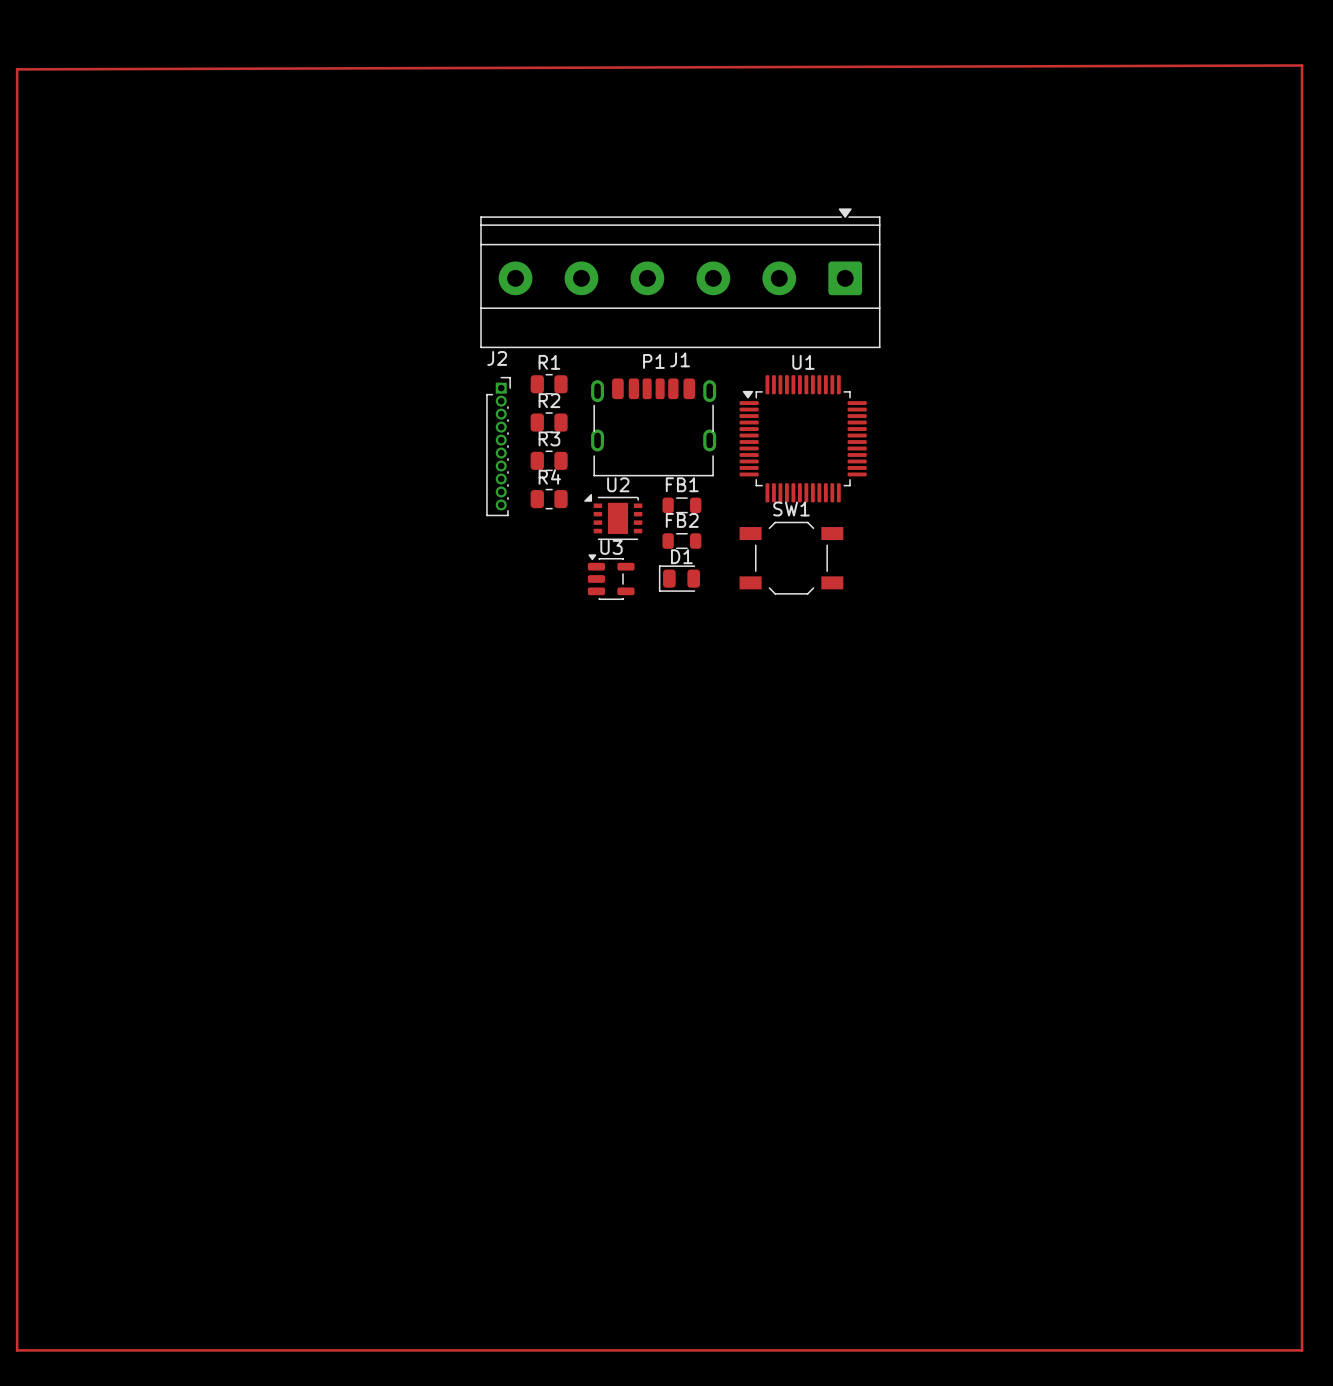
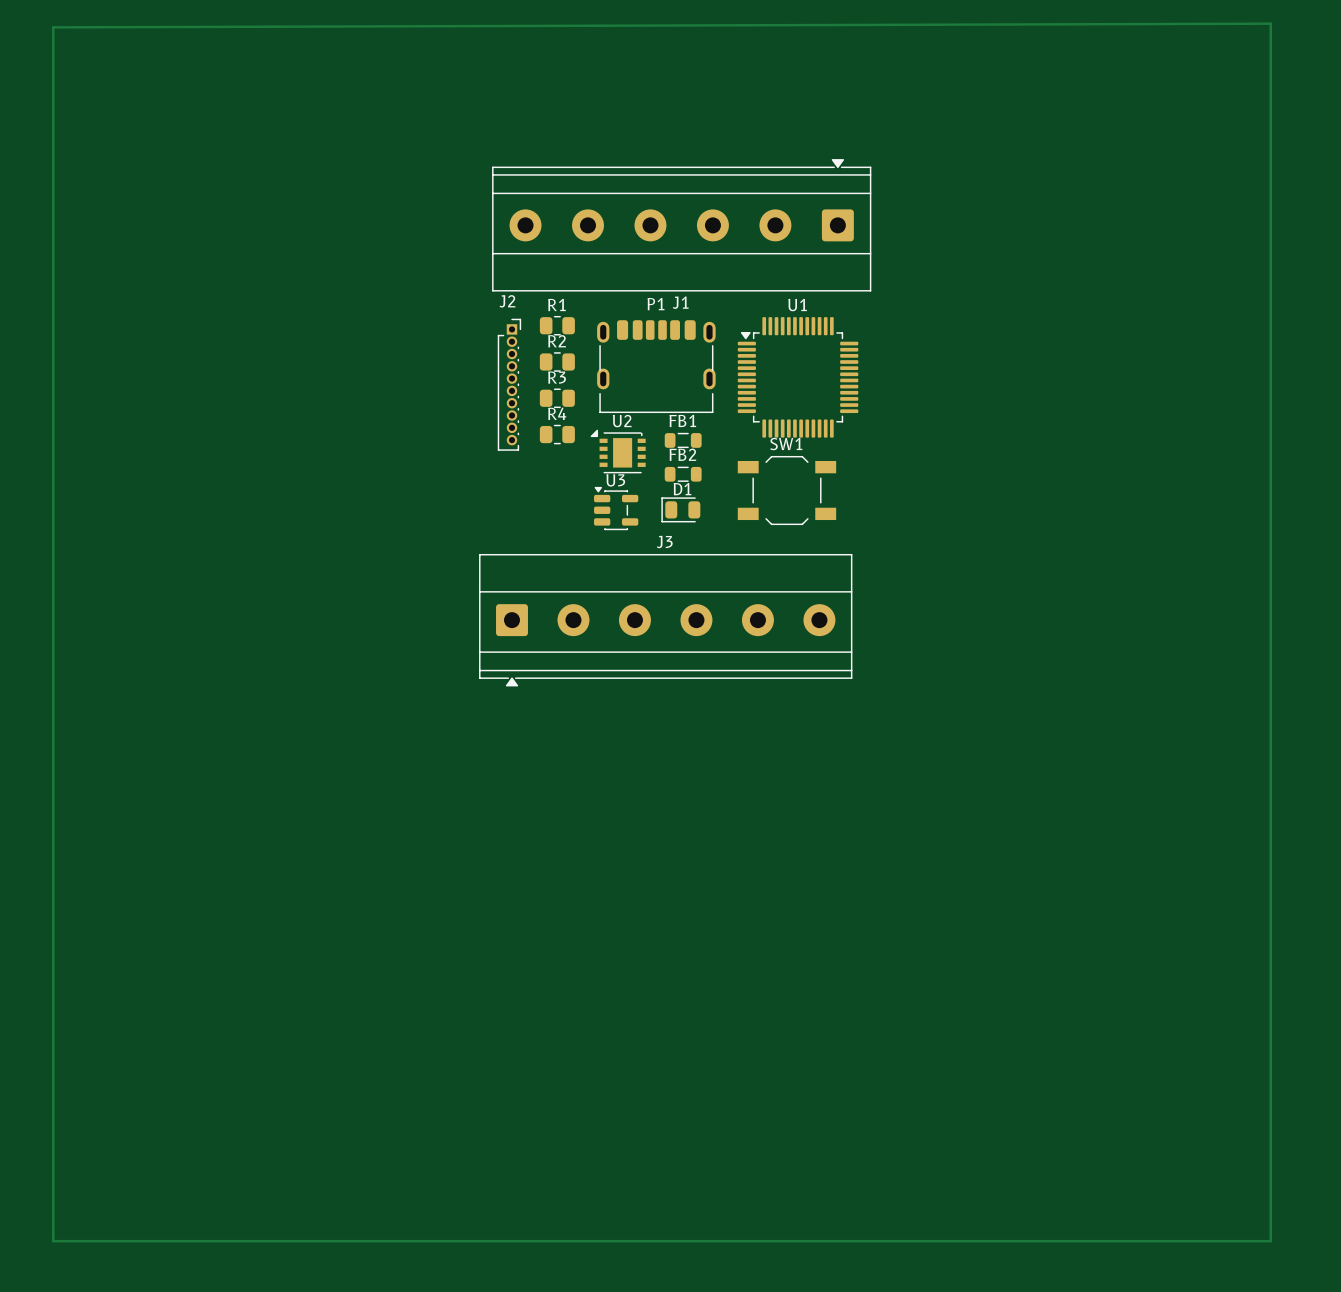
J3: none -> (665, 620)

